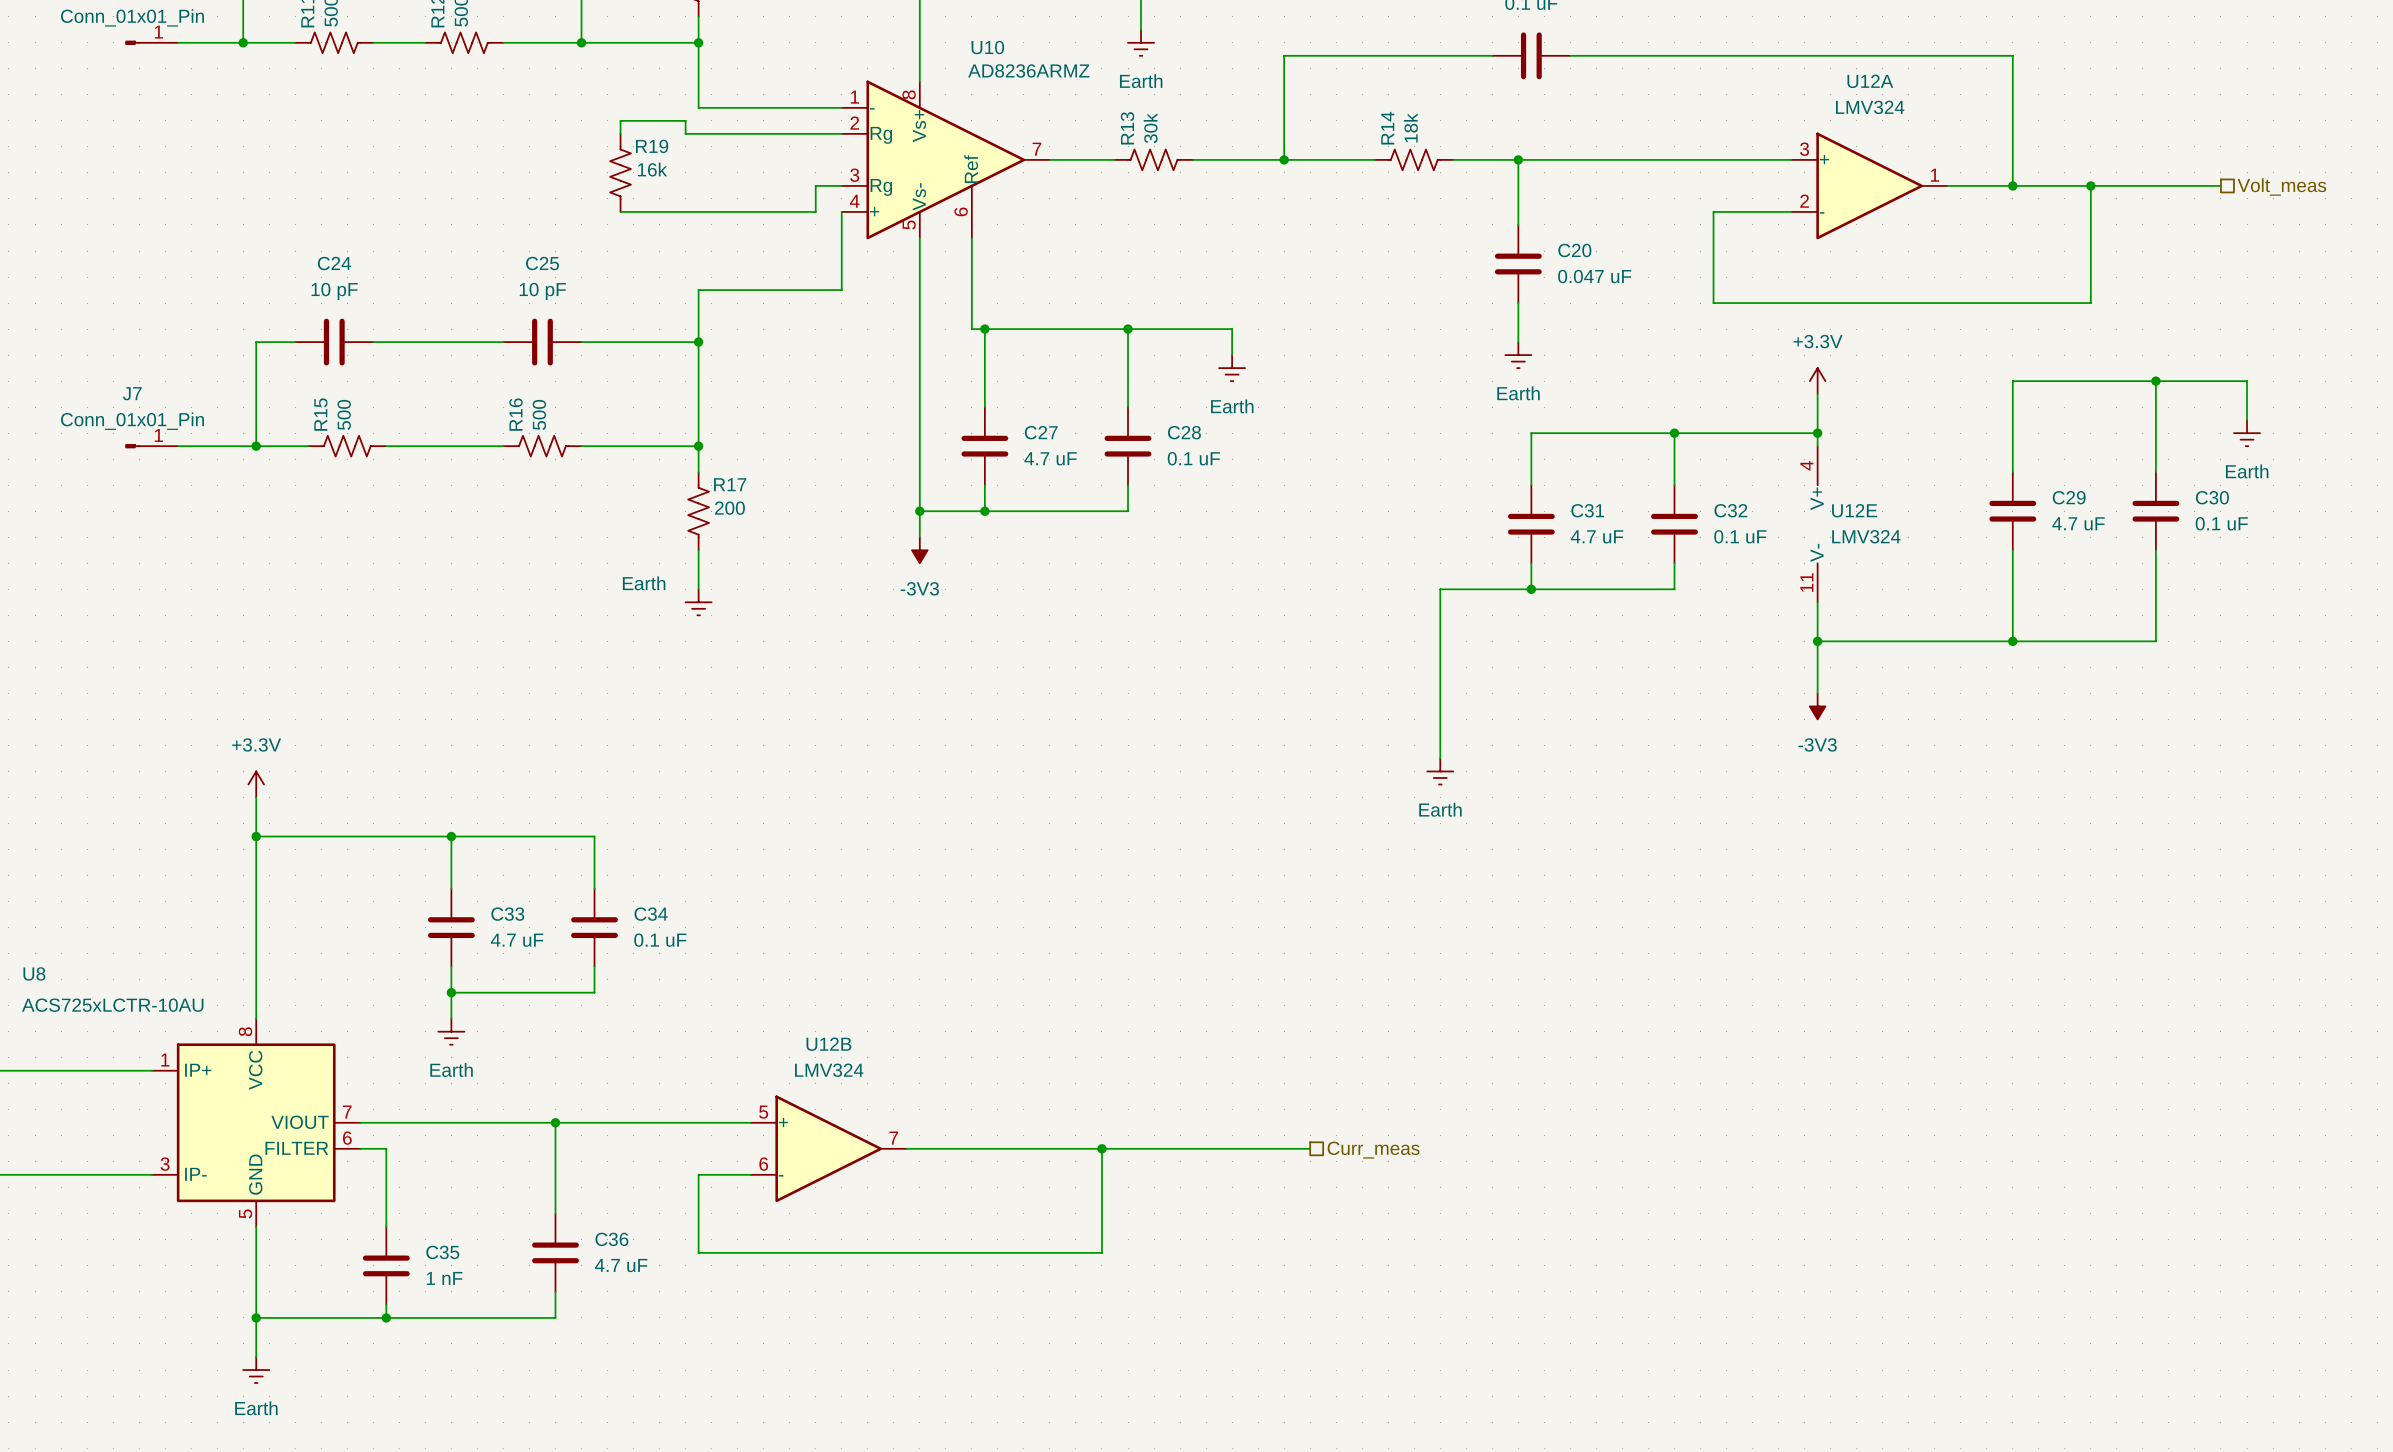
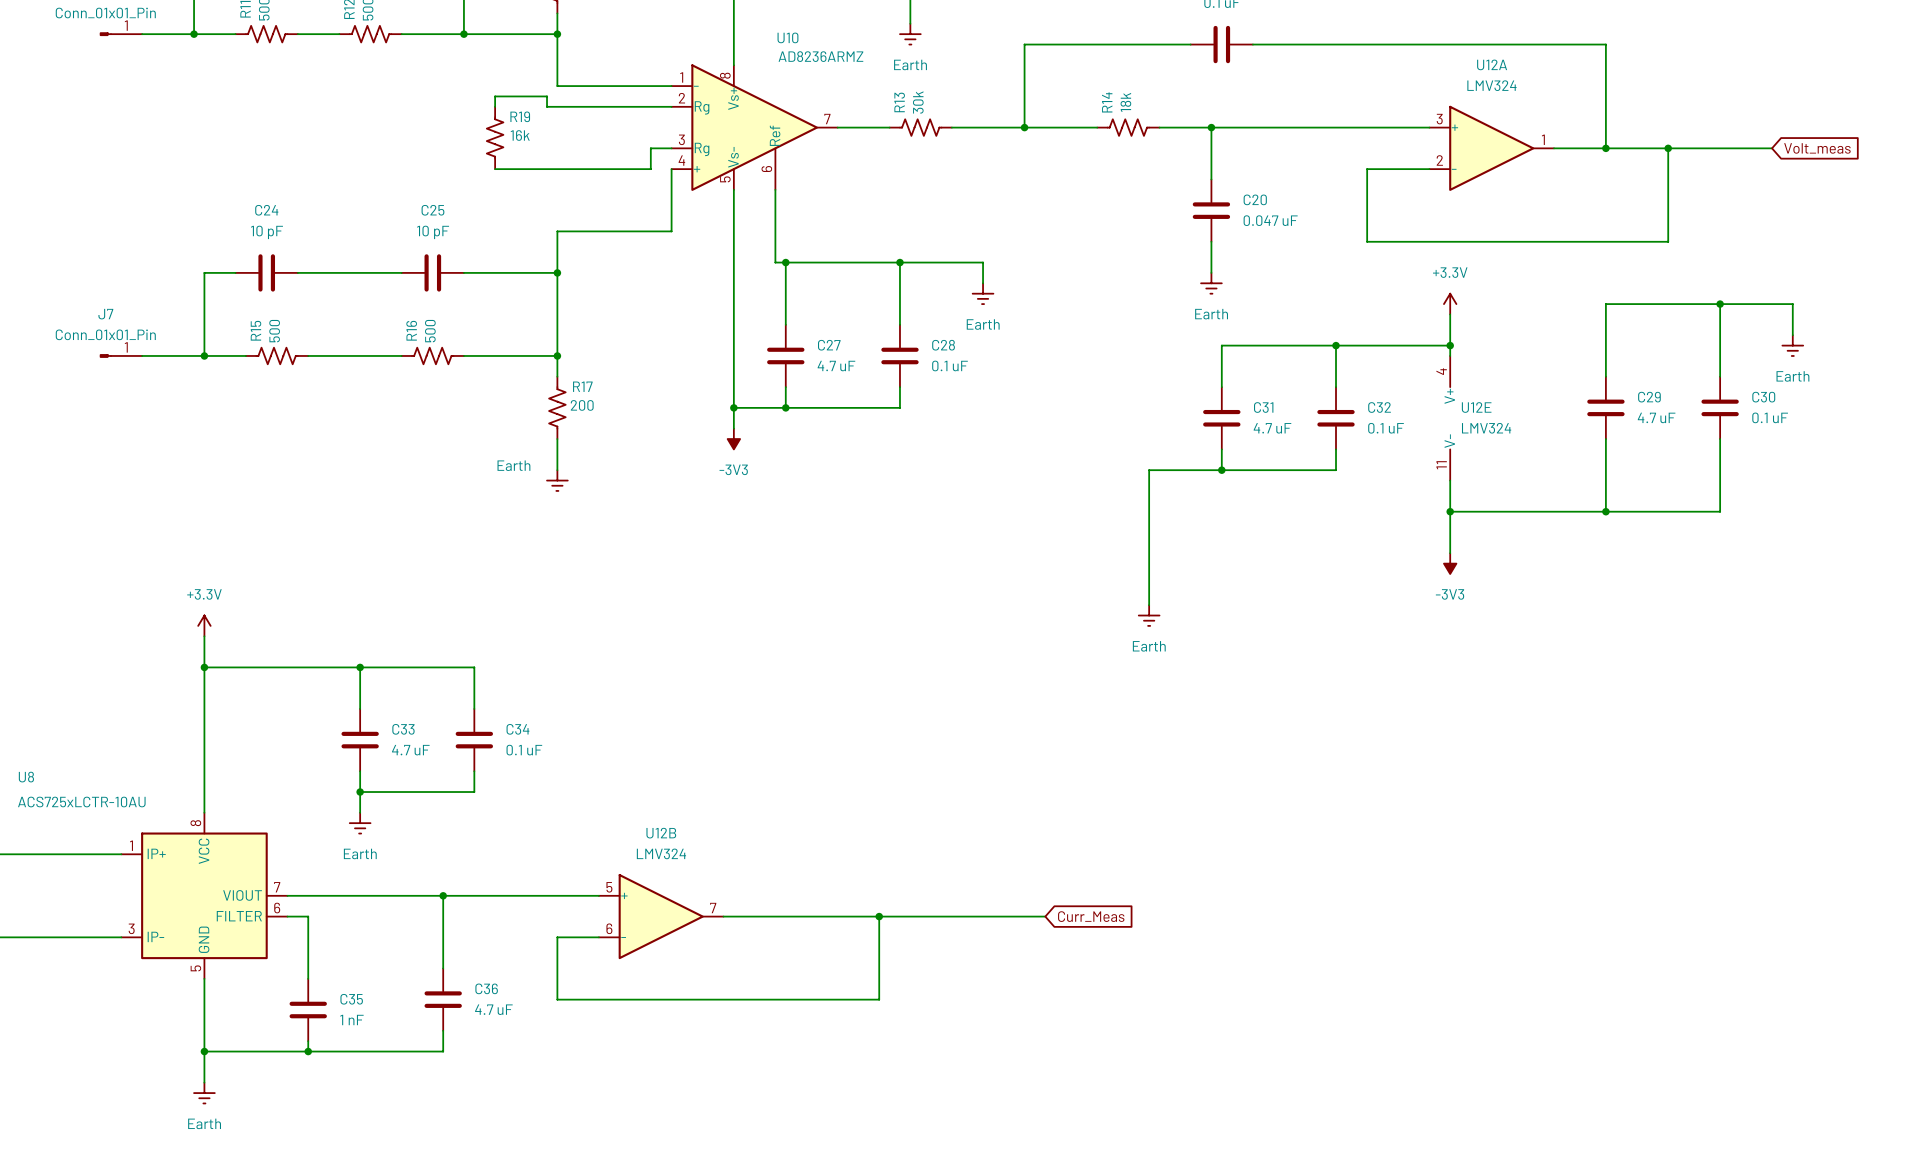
hierarchical label: Volt_meas (2281, 186) -> none
global label: none -> Volt_meas (1817, 148)
global label: none -> Curr_Meas (1091, 916)
hierarchical label: Curr_meas (1373, 1150) -> none

